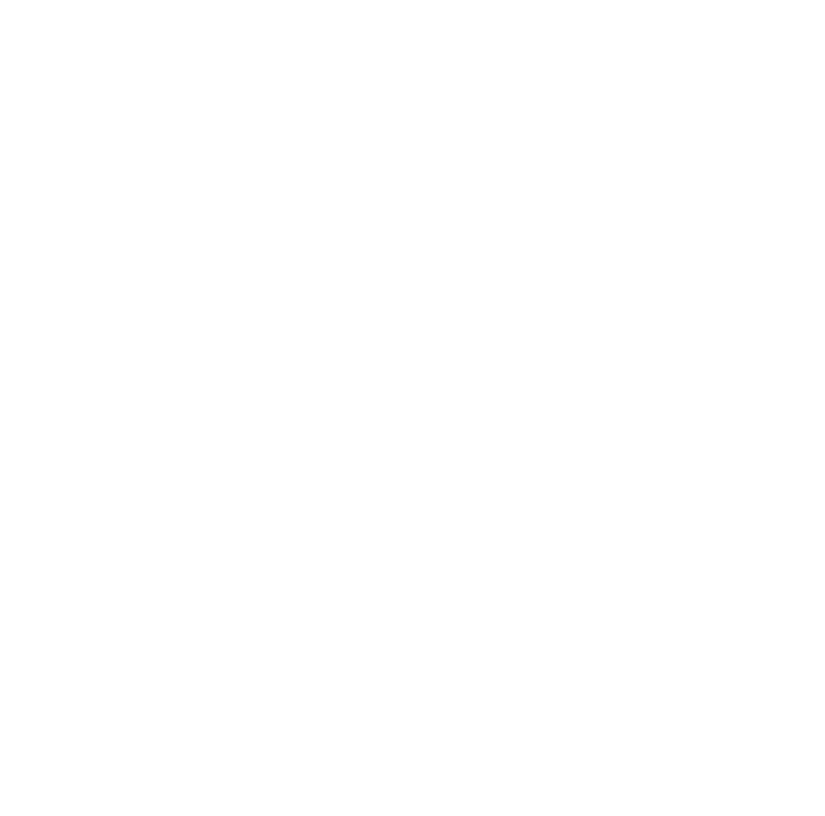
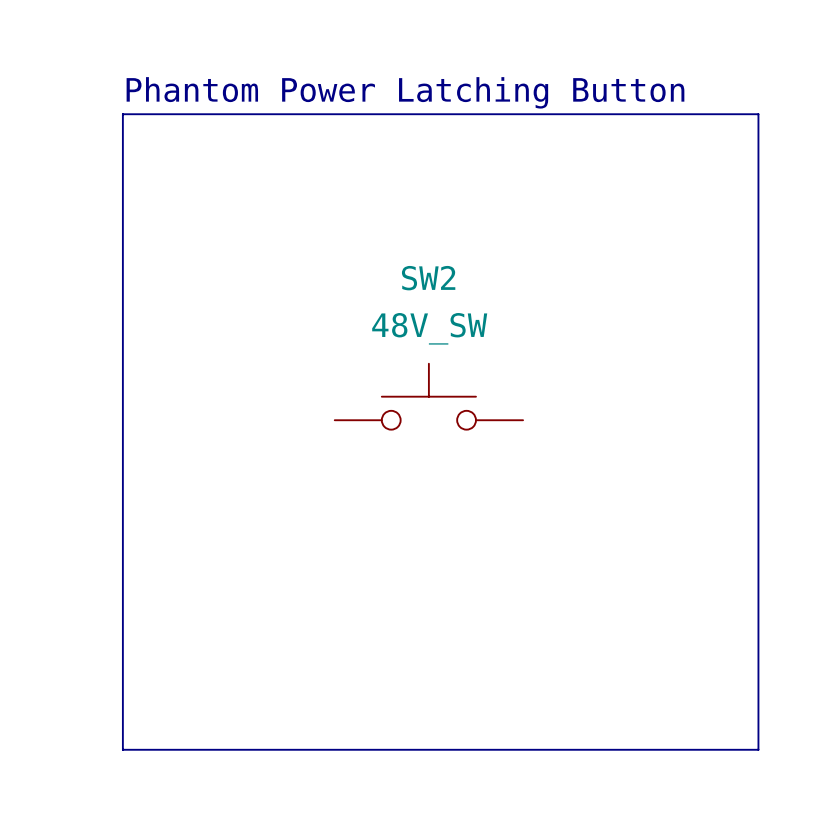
text: none -> Phantom Power Latching Button (405, 92)
line: none -> (122, 114) (758, 114) (758, 749) (122, 749) (122, 114)
SW2: none -> 48V_SW (428, 396)

